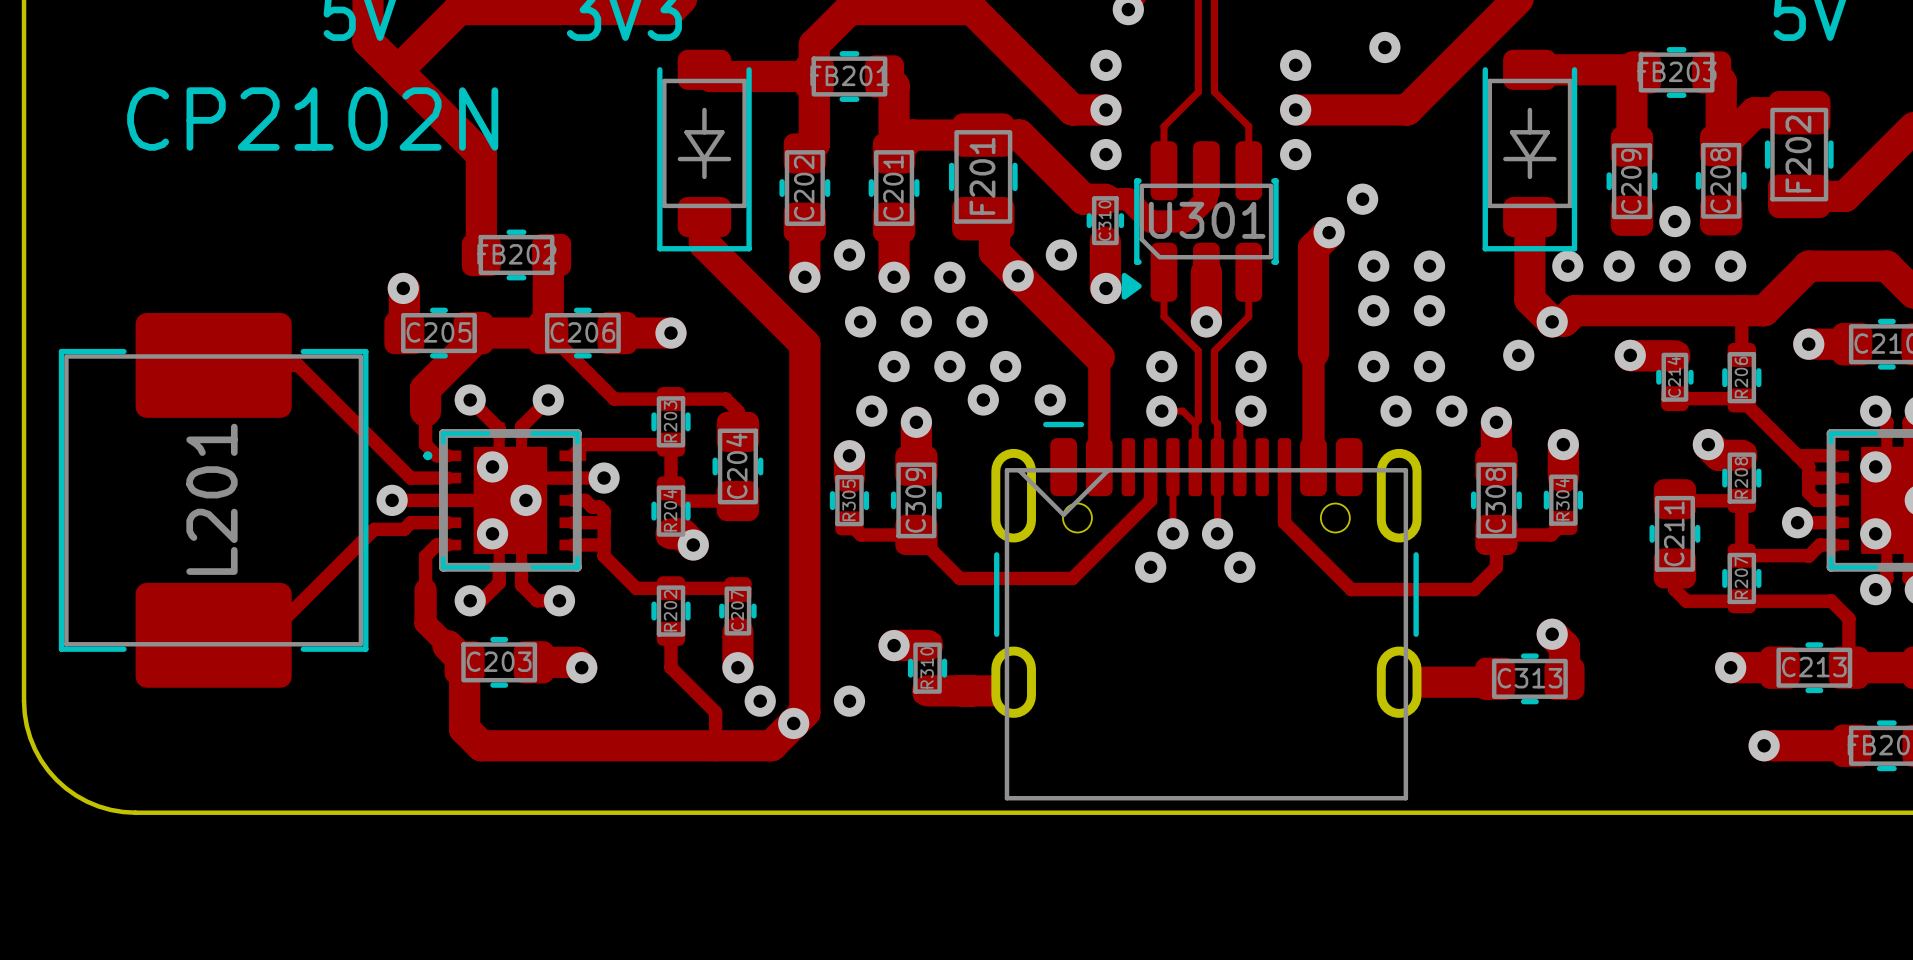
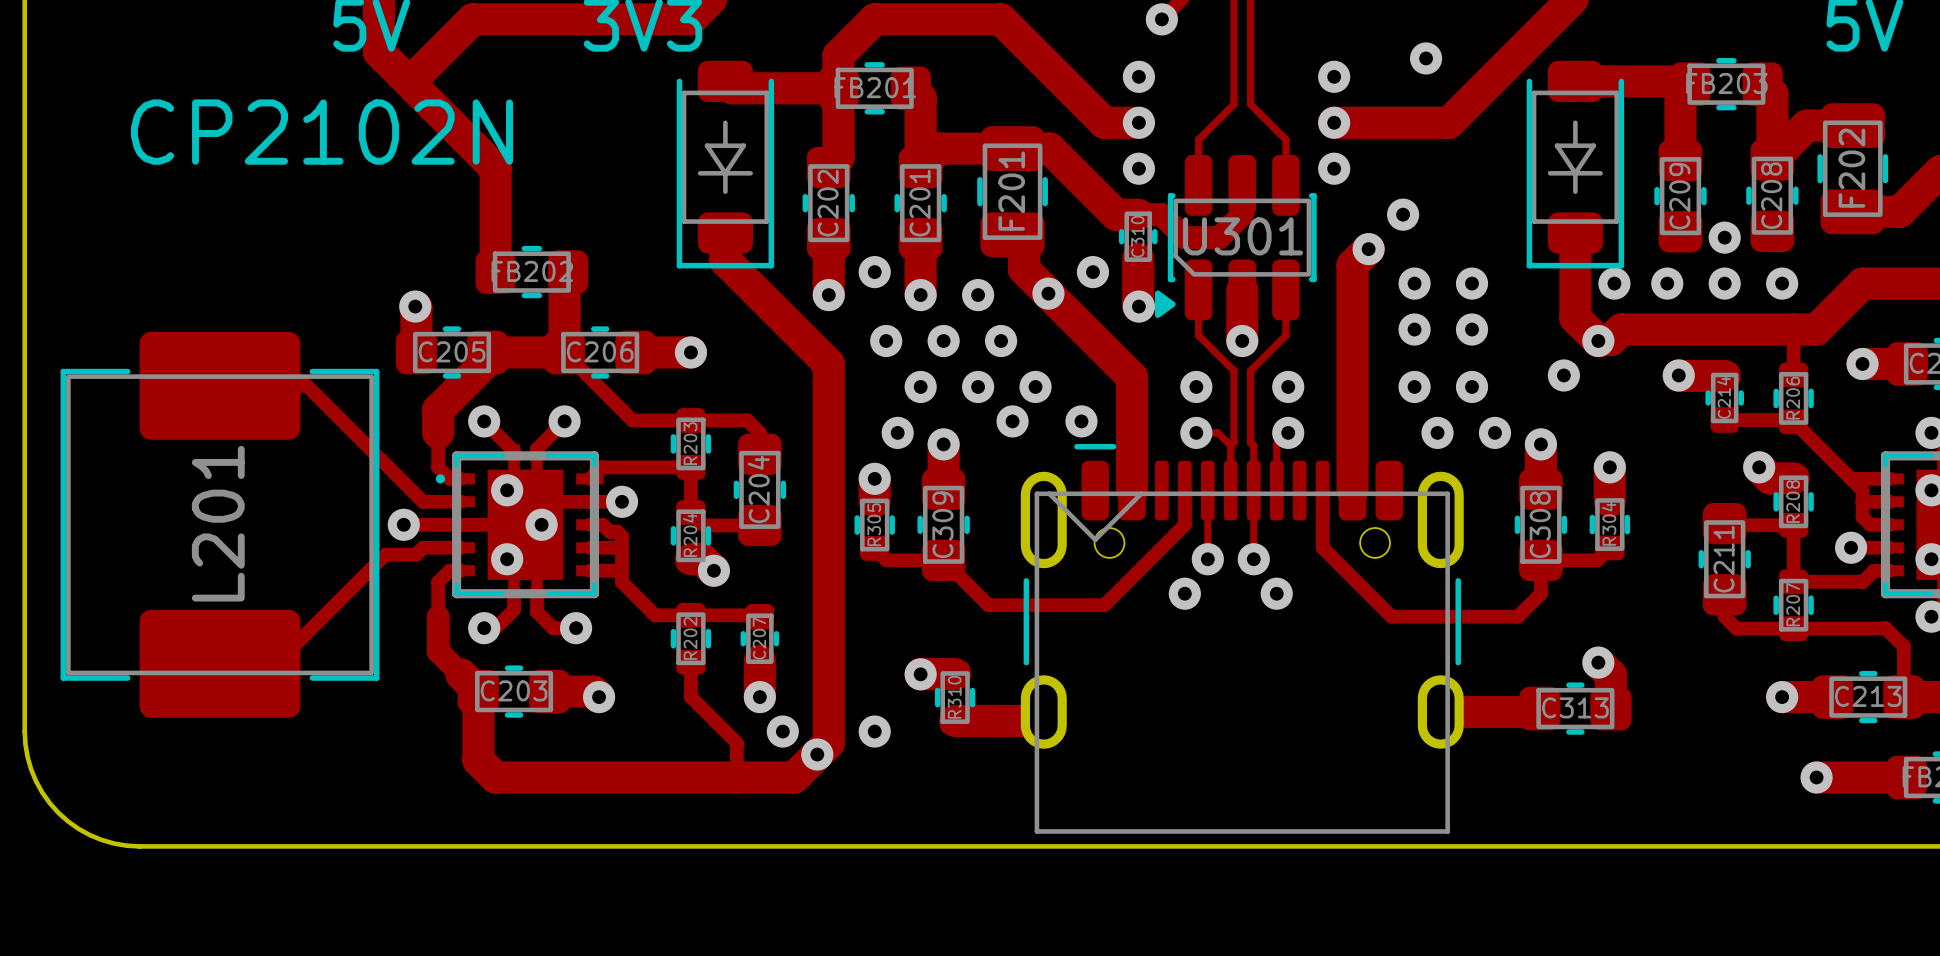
track width: thin (1313, 353) (1313, 467) -> thick (1352, 373) (1352, 490)
track width: thin (1099, 357) (1099, 467) -> thick (1132, 377) (1132, 490)

